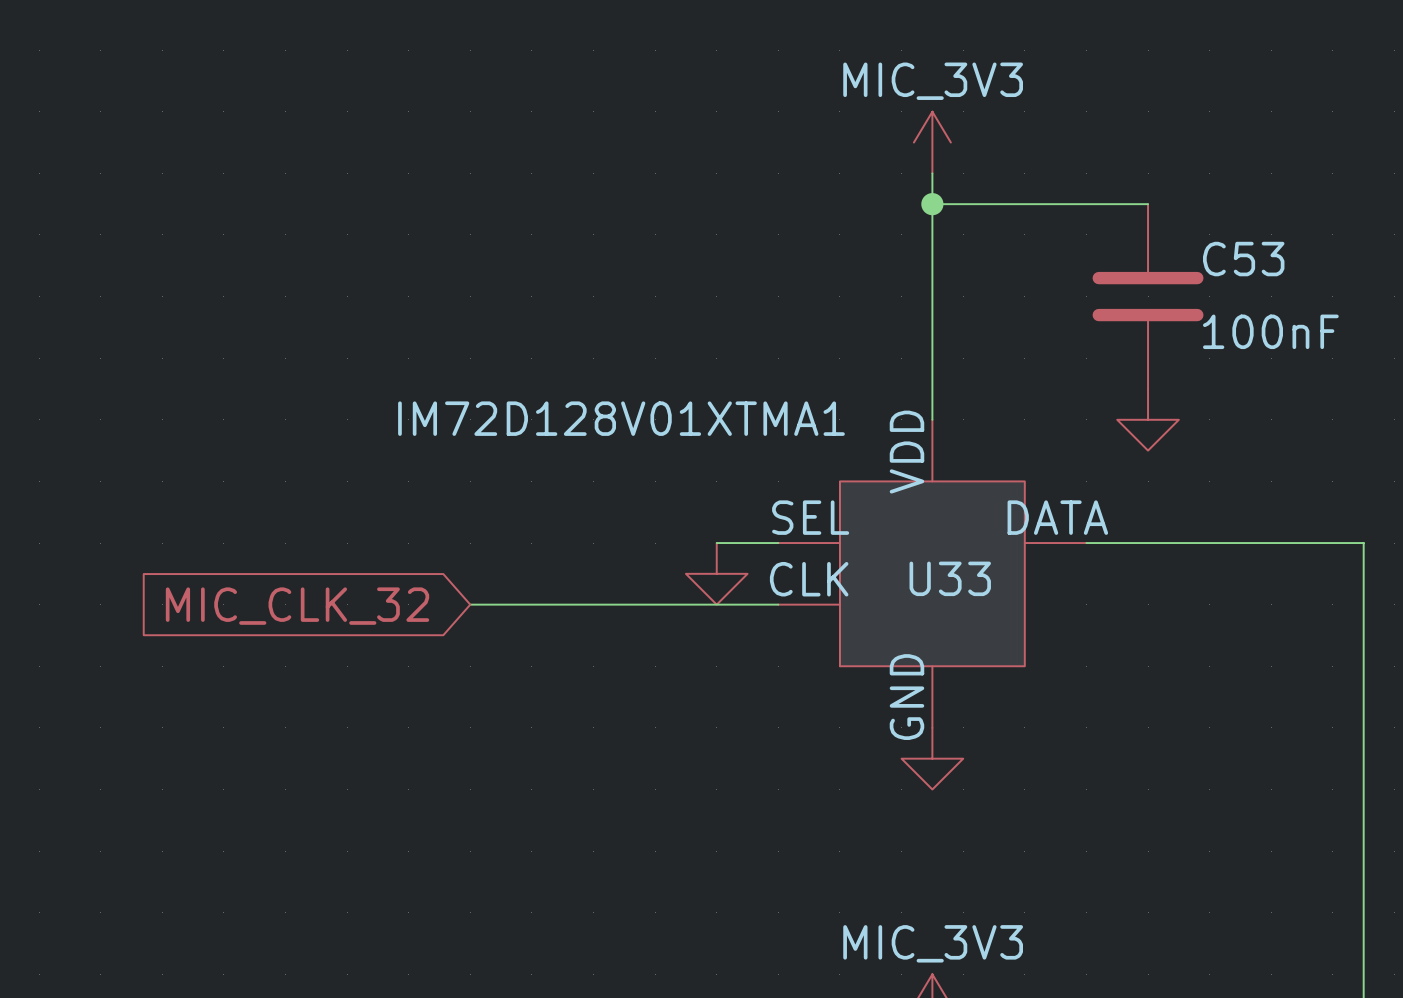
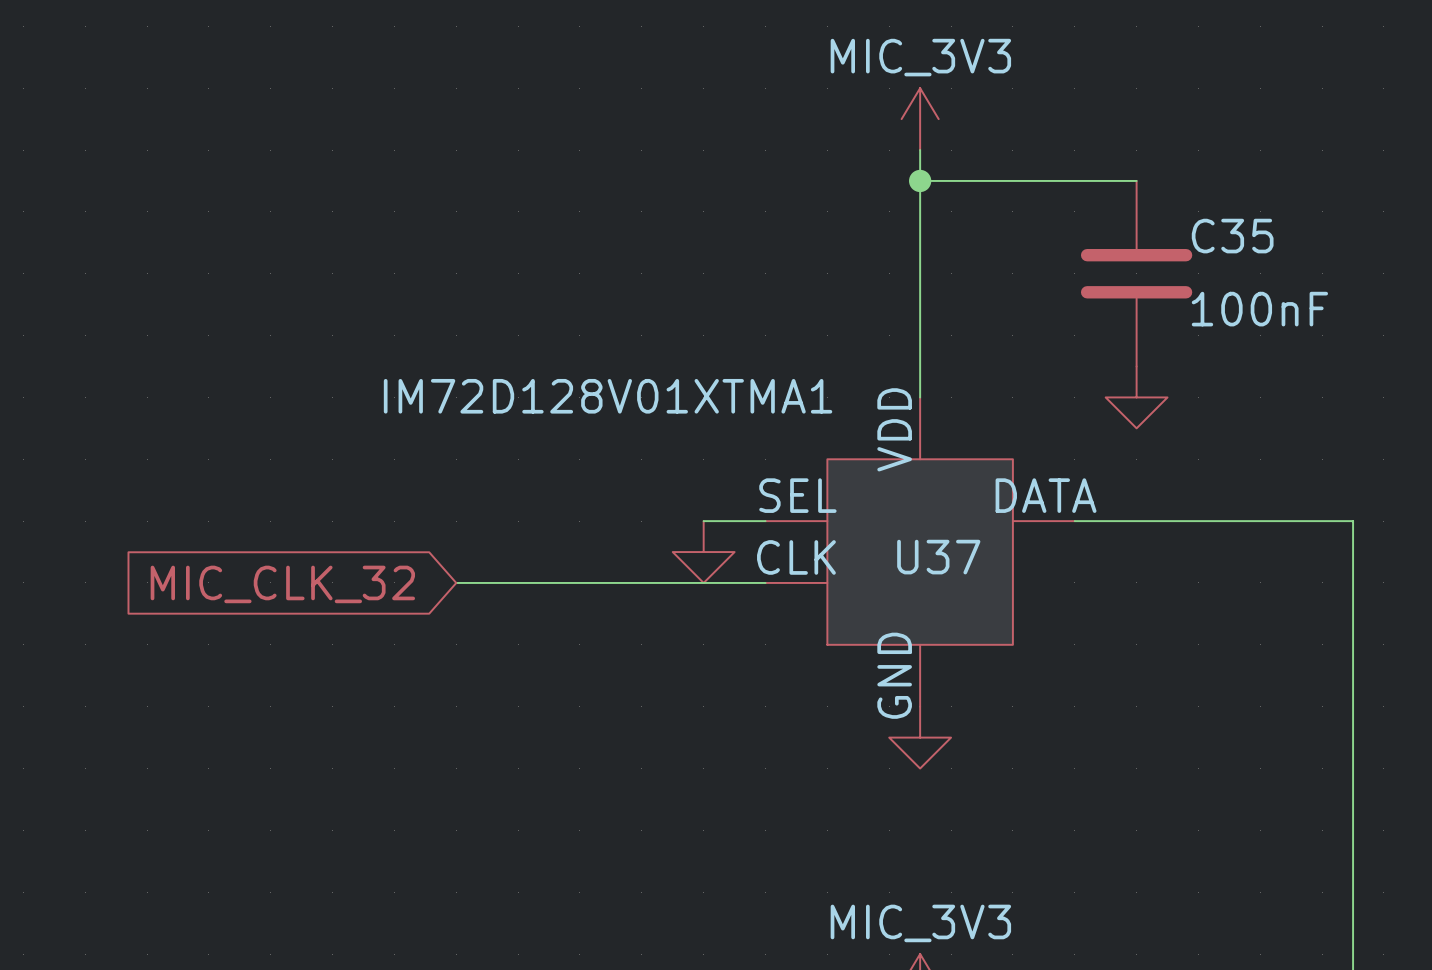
C53 name: C53 (1243, 259) -> C35 (1232, 236)
U33 name: U33 (950, 578) -> U37 (938, 557)

